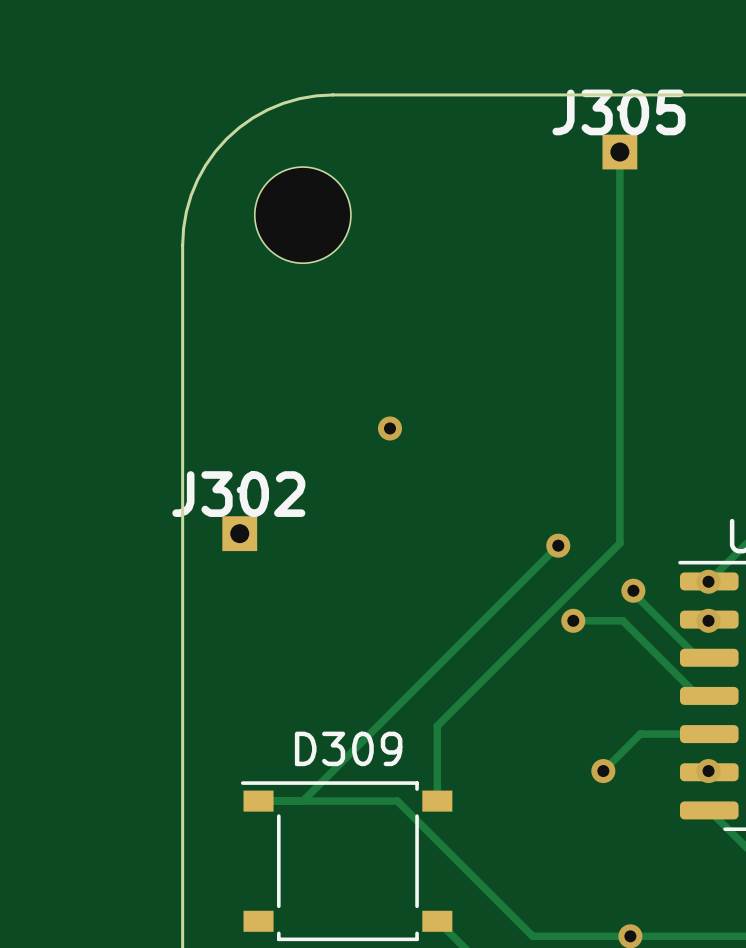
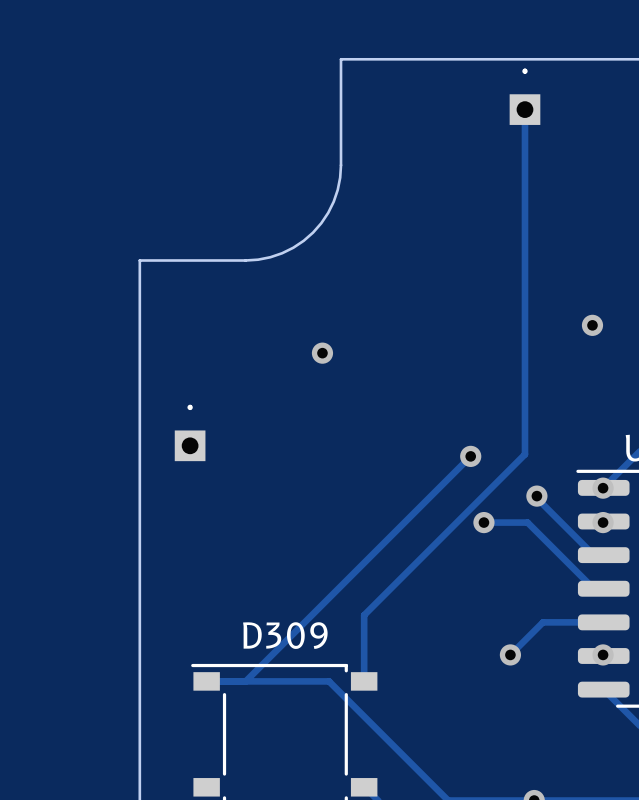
board edge: (411, 94) (332, 94) (299, 98) (267, 109) (252, 117) (226, 138) (205, 165) (197, 179) (186, 211) (182, 245) (182, 323) -> (341, 59) (340, 177) (333, 201) (328, 212) (313, 232) (293, 247) (270, 257) (258, 259) (139, 260)
J305 name: J305 (618, 112) -> none
part: (302, 215) -> none
via: none -> (592, 325)
J302 name: J302 (238, 494) -> none

